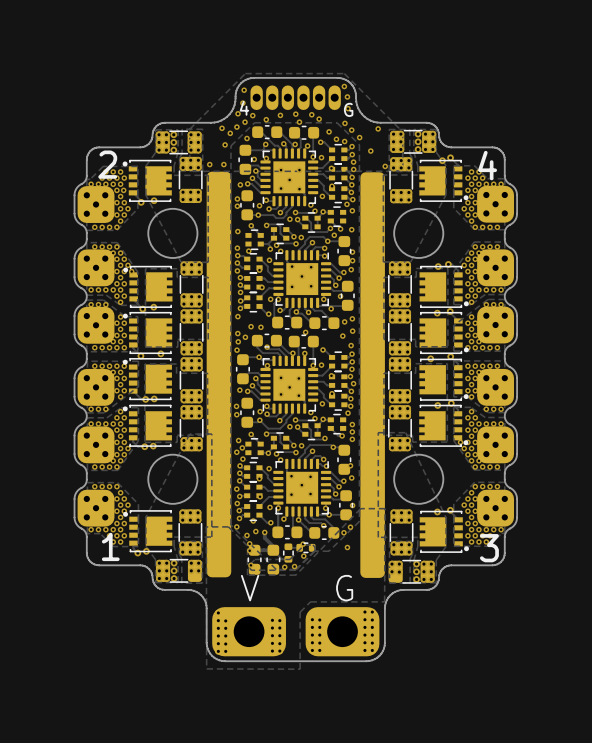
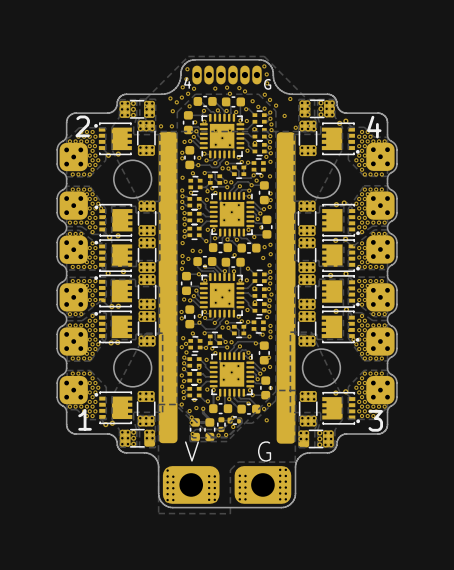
via: (266, 119) -> none

